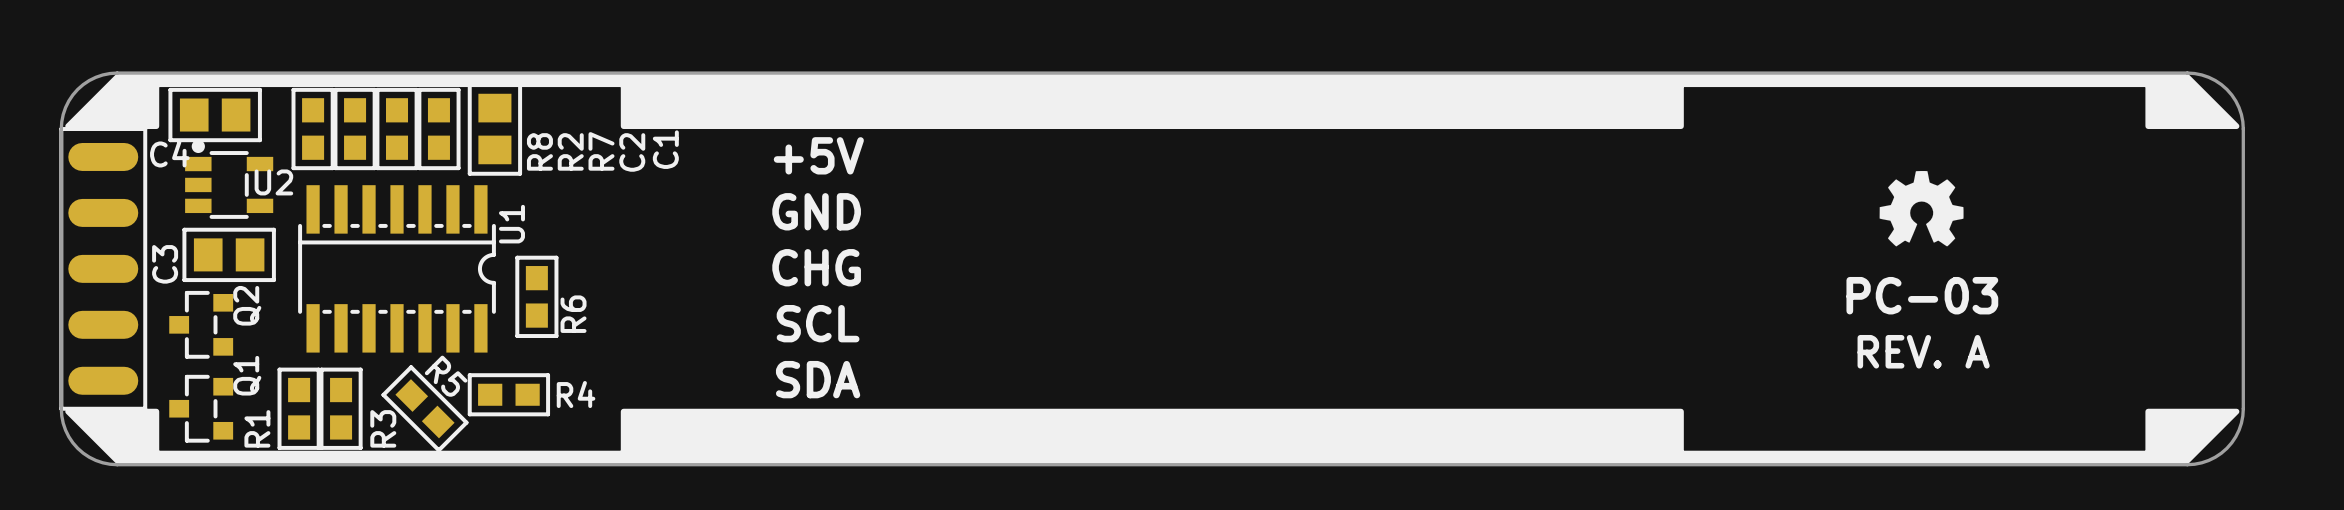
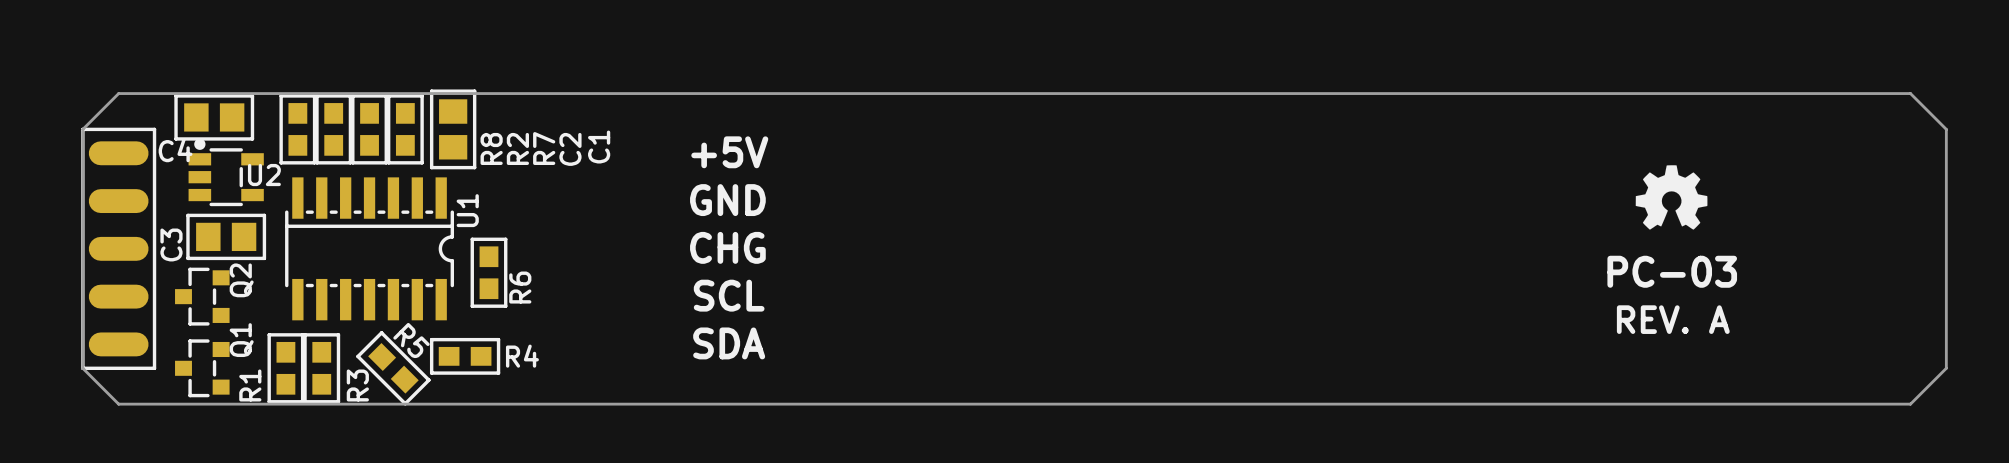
drawing: [65, 73, 2240, 130] -> none
board edge: (61, 129) (65, 107) (77, 89) (95, 77) (117, 73) (2187, 73) (2208, 77) (2226, 89) (2239, 107) (2243, 129) -> (82, 129) (118, 93) (1910, 93) (1946, 129)
board edge: (61, 408) (65, 430) (77, 448) (95, 460) (117, 464) (2187, 464) (2208, 460) (2226, 448) (2239, 430) (2243, 408) -> (82, 368) (118, 404) (1910, 404) (1946, 368)
drawing: [65, 408, 2240, 465] -> none

